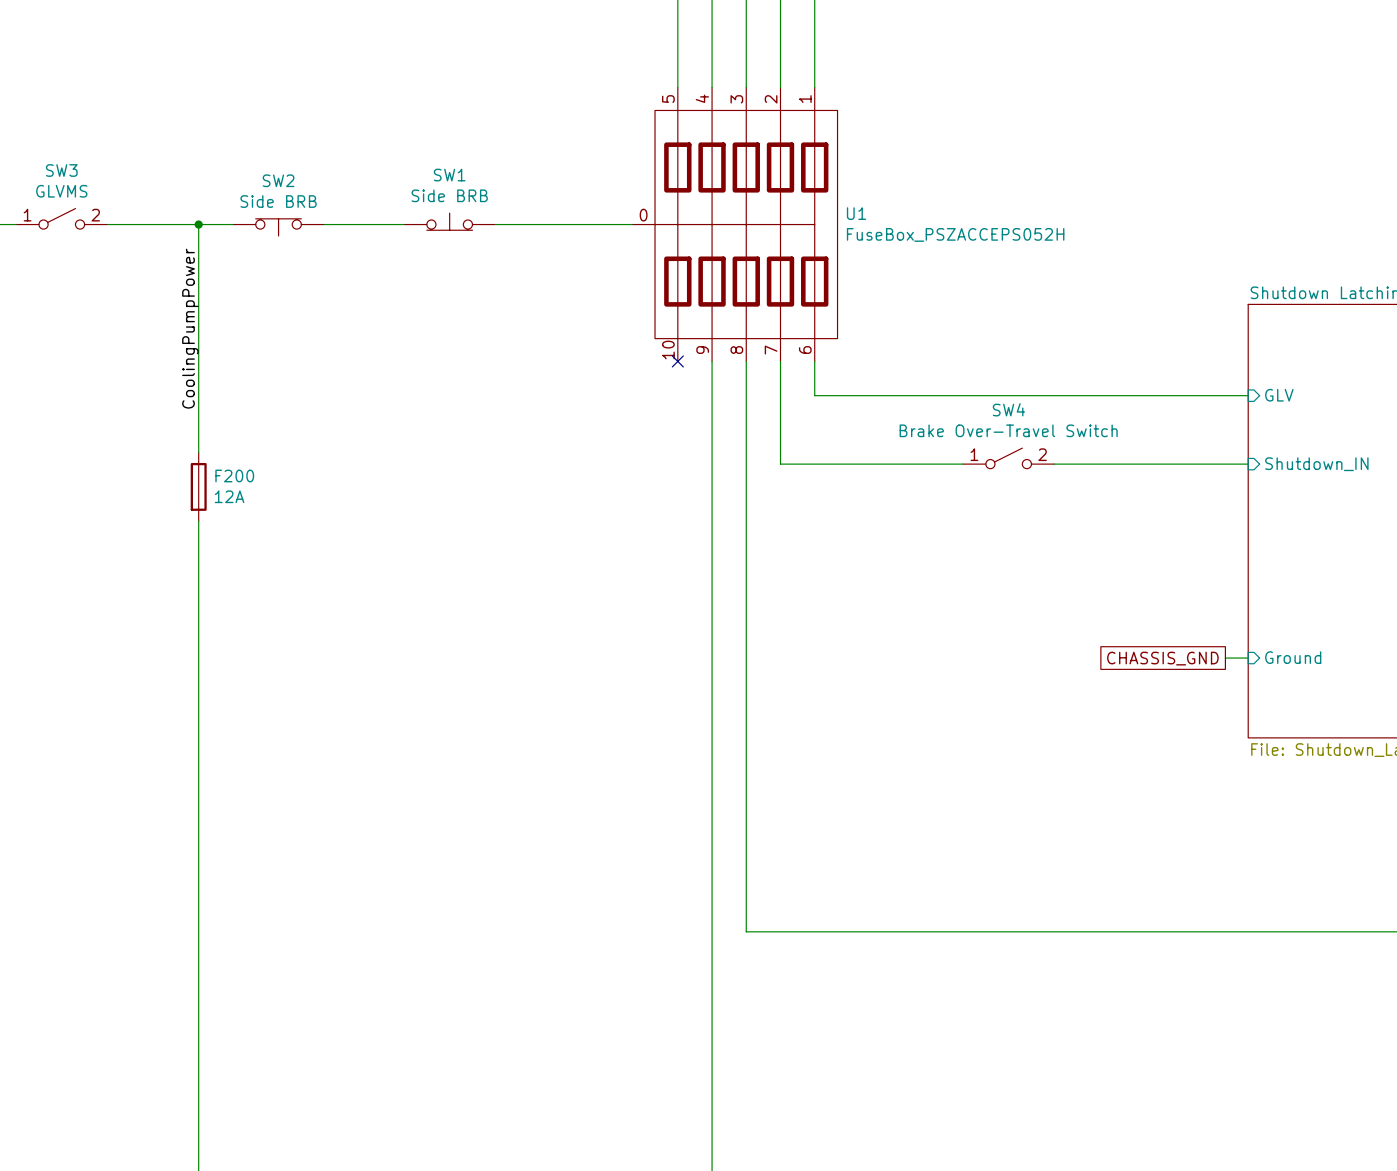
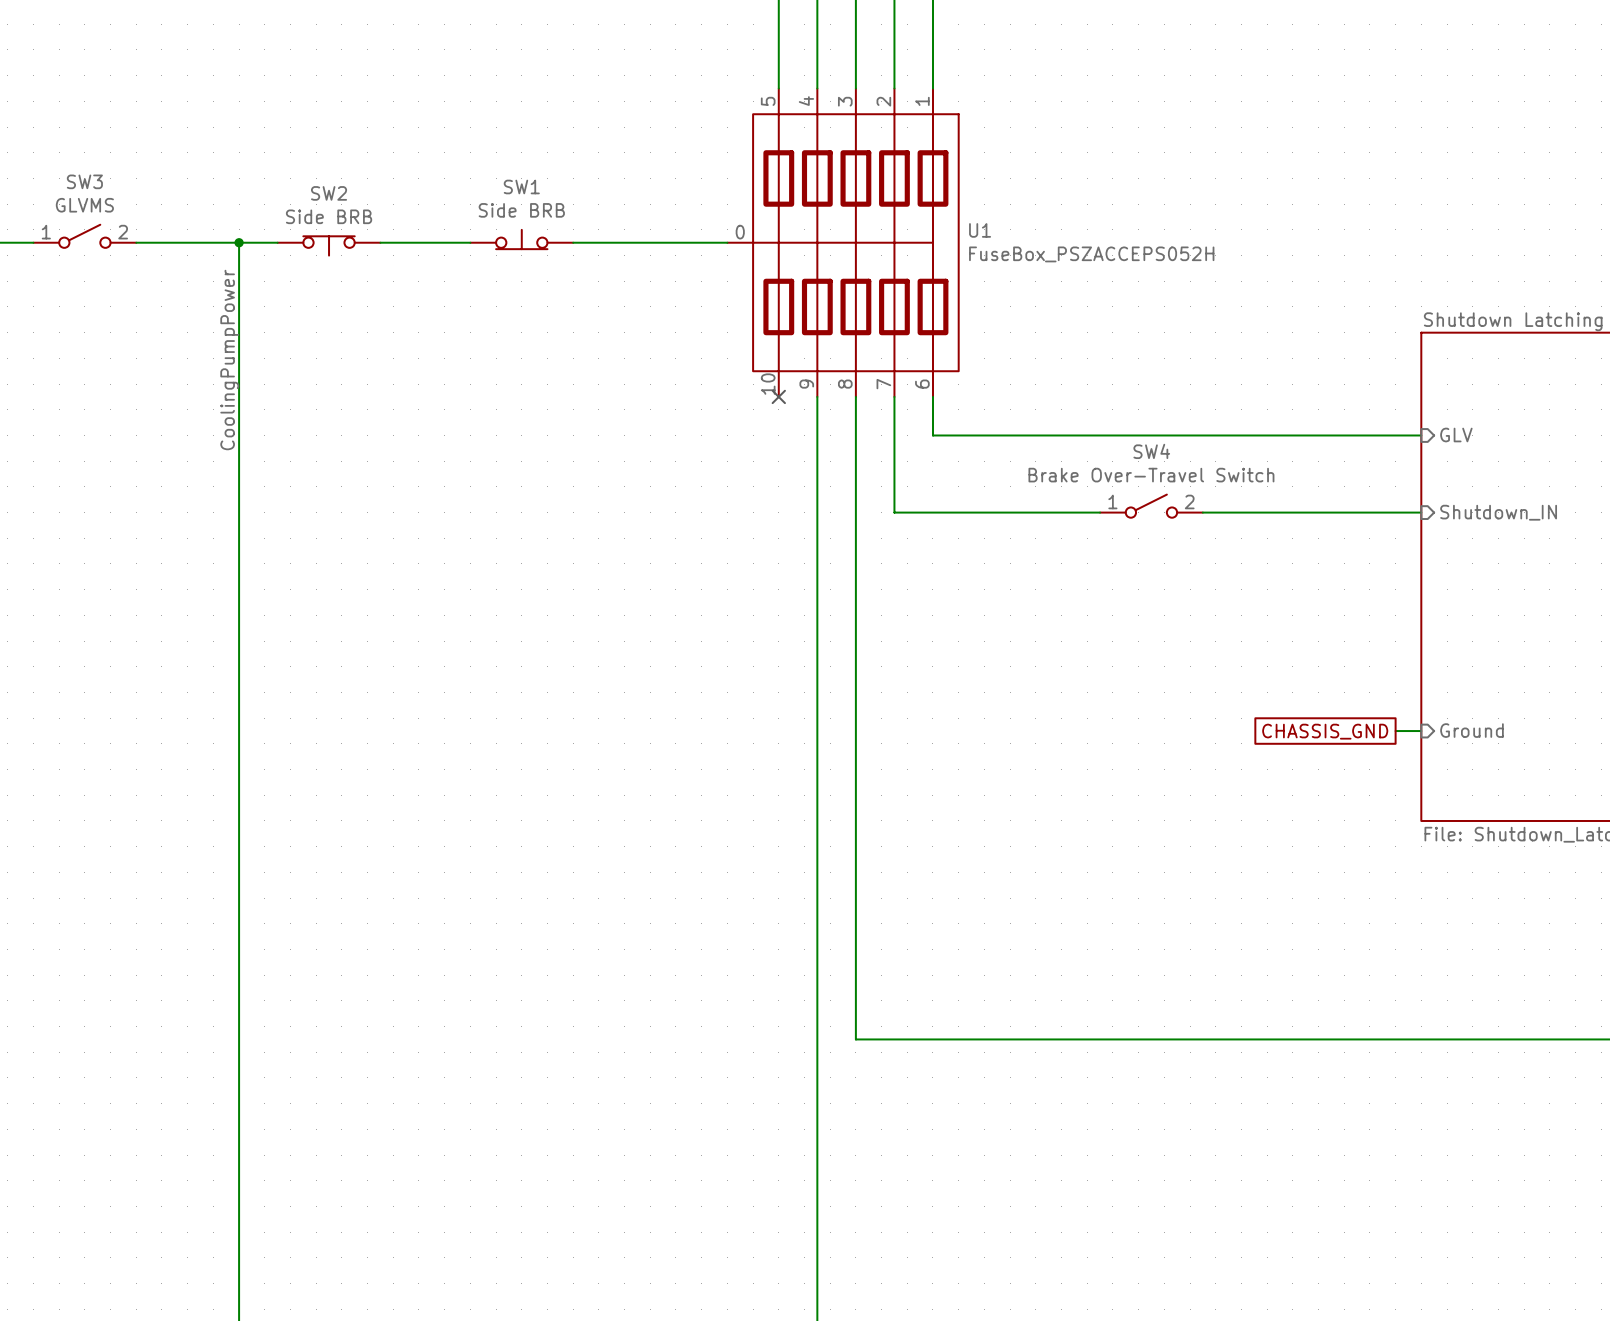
F200: 12A (198, 486) -> none

